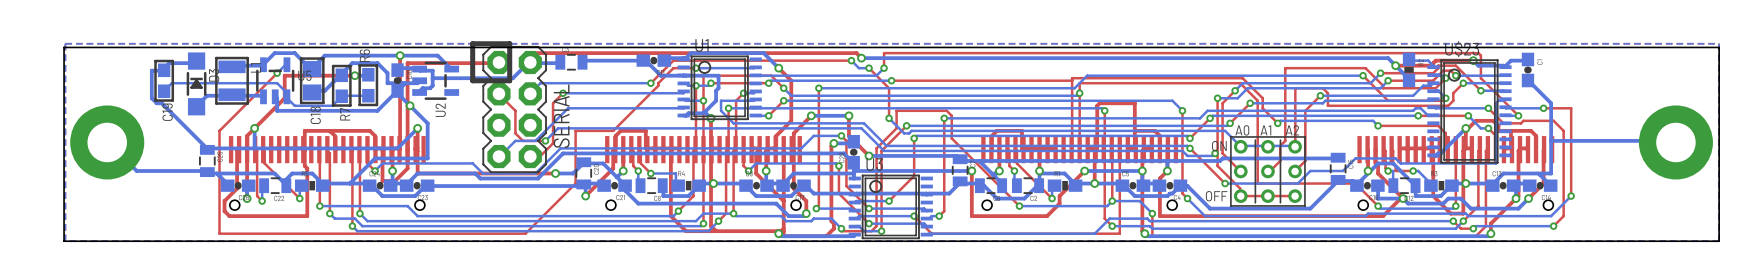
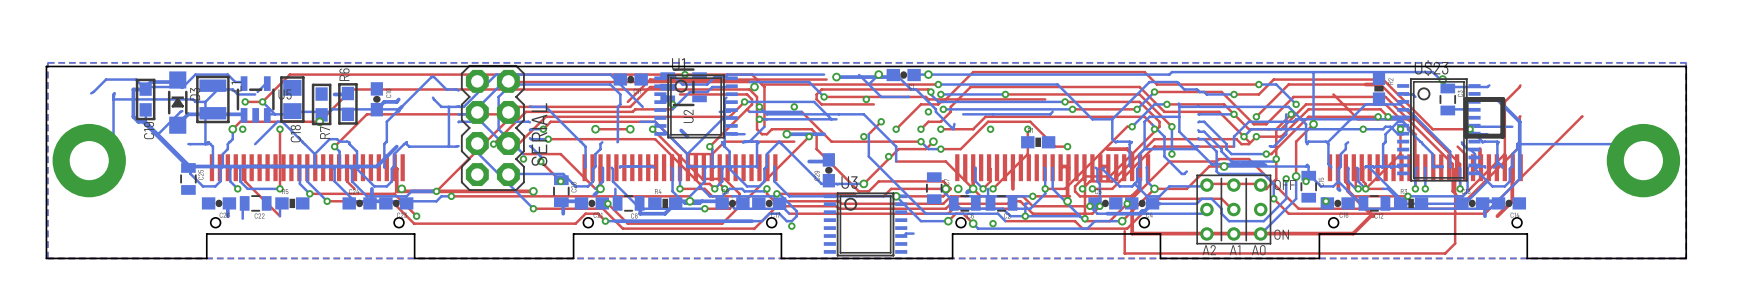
line: (509, 43) (509, 80) (472, 80) (472, 43) (509, 43) -> none
top track: (999, 53) (884, 53) (884, 68) -> (973, 72) (943, 101) (938, 104) (920, 104) (896, 129)
top track: (1172, 53) (1478, 53) (1480, 55) (1480, 78) (1518, 115) -> (1144, 72) (1157, 84) (1258, 84)
bottom track: none -> (1313, 72) (1313, 124)
top track: (400, 55) (400, 148) (391, 149) (392, 170) -> none
via: (400, 55) -> none
via: none -> (684, 74)
bottom track: none -> (824, 74) (727, 74) (726, 76) (714, 77) (707, 84) (682, 84) (675, 77) (667, 75)
bottom track: none -> (878, 74) (868, 84)
via: none -> (878, 74)
via: none -> (928, 74)
bottom track: none -> (859, 75) (881, 96) (908, 96)
bottom track: none -> (914, 75) (1432, 72) (1447, 88) (1489, 85)
top track: (861, 58) (856, 53) (530, 53) (530, 62) -> none
bottom track: (924, 58) (1388, 58) (1409, 80) -> (898, 77) (911, 89) (916, 89) (953, 129) (954, 123)
bottom track: (1409, 59) (1428, 60) (1433, 67) -> none
bottom track: (1527, 59) (1510, 60) (1505, 67) (1478, 65) (1473, 60) -> none
bottom track: (664, 60) (665, 58) (683, 59) (690, 53) (763, 53) (778, 68) -> none
bottom track: (851, 60) (858, 68) (869, 68) -> none
via: (851, 60) -> none
top track: (1473, 60) (1435, 60) (1433, 65) (1410, 65) -> (1460, 188) (1460, 164) (1380, 84)
top track: (498, 62) (407, 63) (407, 168) (395, 181) (382, 181) (383, 149) (375, 149) (374, 135) (369, 130) (331, 132) -> none
bottom track: (560, 62) (527, 63) (512, 78) (432, 78) -> none
part rotation: 0° (571, 62) -> 90° clockwise (1447, 99)
part position: (571, 62) -> (1447, 99)
bottom track: (582, 62) (583, 60) (645, 60) (660, 75) (718, 75) (716, 100) (703, 113) (688, 113) (683, 115) -> none
bottom track: none -> (503, 82) (471, 114) (458, 114)
bottom track: none -> (749, 82) (809, 82) (824, 96)
top track: none -> (749, 82) (503, 82)
bottom track: none -> (244, 83) (235, 82) (227, 74) (195, 74) (182, 87) (145, 87) (135, 79) (106, 79) (91, 93)
top track: none -> (938, 84) (761, 84)
via: none -> (938, 84)
bottom track: none -> (1258, 84) (1276, 84) (1296, 104)
via: none -> (1258, 84)
top track: none -> (1365, 84) (1288, 84) (1256, 116)
via: (1395, 65) -> none
bottom track: (232, 66) (262, 65) (274, 53) (294, 53) (312, 69) (324, 55) (437, 55) (451, 69) -> none
top track: none -> (1520, 85) (1504, 101) (1504, 154) (1462, 196) (1457, 196) (1452, 191) (1452, 164) (1385, 96) (1293, 96) (1266, 124) (1253, 124) (1221, 91) (1154, 91)
via: (695, 68) -> none
bottom track: (736, 68) (695, 68) -> (712, 87) (707, 91) (689, 91) (672, 109)
top track: (778, 68) (791, 80) (791, 120) (776, 135) (775, 149) (768, 148) (766, 150) (766, 170) -> none
top track: (869, 68) (889, 88) (889, 118) -> none
via: (869, 68) -> none
bottom track: (884, 68) (876, 75) (755, 75) -> none
via: (884, 68) -> none
bottom track: (397, 70) (397, 68) (417, 68) (420, 70) (432, 70) (432, 85) (430, 88) (422, 88) -> (458, 90) (446, 89) (434, 77) (431, 77) (401, 106)
part rotation: 0° (1527, 70) -> 90° clockwise (903, 75)
part position: (1527, 70) -> (903, 75)
top track: (277, 73) (219, 130) (219, 233) (525, 233) (575, 183) (575, 130) (613, 130) (658, 85) (658, 83) -> (334, 146) (366, 114) (506, 114) (513, 106) (630, 106) (635, 101)
via: (277, 73) -> none
bottom track: none -> (930, 91) (938, 101) (1065, 101)
top track: none -> (930, 91) (928, 89) (821, 89) (816, 94) (816, 99) (821, 104) (873, 104)
via: none -> (930, 91)
bottom track: none -> (1154, 91) (1137, 109)
via: none -> (1154, 91)
bottom track: (1380, 73) (1370, 83) (1242, 83) (1235, 90) -> none
top track: (1380, 73) (1433, 73) (1438, 65) (1455, 65) (1480, 90) -> none
via: (1380, 73) -> none
bottom track: none -> (255, 94) (237, 94) (232, 89) (218, 87) (205, 101) (205, 144) (208, 142)
top track: (354, 75) (284, 75) (284, 98) (247, 135) (247, 198) -> none
via position: (354, 75) -> (319, 121)
top track: (703, 75) (703, 223) -> none
via: none -> (940, 94)
bottom track: none -> (1005, 94) (940, 94)
top track: none -> (1005, 94) (1139, 94) (1171, 126)
via: none -> (1005, 94)
bottom track: (1235, 75) (1087, 75) (1074, 88) (818, 88) -> (1206, 94) (1196, 89) (1184, 89) (1176, 82) (1149, 82) (1112, 119) (1112, 139) (1115, 142) (1131, 142) (1129, 144) (1129, 166)
top track: none -> (1234, 94) (1258, 94) (1273, 79) (1383, 79) (1432, 129) (1470, 129)
via: none -> (1234, 94)
bottom track: (1363, 75) (1262, 75) -> none
via: (1363, 75) -> none
top track: (1455, 75) (1450, 70) (1443, 70) (1433, 80) (1388, 80) -> none
via: (1455, 75) -> none
bottom track: (1505, 75) (1455, 75) -> none
bottom track: none -> (432, 97) (441, 106) (463, 106) (496, 74) (610, 74) (642, 106)
bottom track: none -> (726, 97) (724, 99) (724, 146) (722, 142) (722, 144) (729, 151) (729, 166) (731, 167) (729, 168) (747, 186) (759, 186) (764, 181) (766, 154) (779, 141) (821, 183) (863, 183)
via: none -> (824, 96)
top track: (1445, 78) (1435, 88) (1383, 88) (1383, 85) (1365, 68) (1285, 68) (1285, 140) (1280, 145) (1280, 160) (1267, 171) -> none
via: (1445, 78) -> none
U2 position: (435, 80) -> (683, 87)
top track: (776, 80) (783, 88) -> (752, 99) (752, 104) (709, 146)
bottom track: (891, 80) (771, 80) (768, 83) -> (831, 119) (814, 101) (744, 101)
top track: (954, 80) (891, 80) -> (928, 99) (925, 96) (824, 96)
bottom track: (1388, 80) (1380, 88) (1317, 88) -> (1327, 142) (1308, 141) (1307, 144) (1306, 124) (1288, 106)
via: (1388, 80) -> none
line: none -> (1502, 99) (1502, 136) (1466, 136) (1466, 99) (1502, 99)
bottom track: (214, 83) (171, 83) (164, 91) -> (195, 101) (193, 99) (113, 99) (114, 93) (113, 94) (113, 136) (89, 160)
bottom track: (224, 83) (277, 83) (284, 90) (284, 95) (294, 105) (332, 105) (342, 95) (368, 95) -> none
top track: none -> (245, 101) (262, 101) (289, 74) (752, 74) (764, 87) (764, 126)
via: none -> (245, 101)
bottom track: none -> (262, 101) (275, 114)
via: none -> (262, 101)
bottom track: (650, 83) (540, 83) (530, 93) -> none
via: (650, 83) -> none
bottom track: (711, 83) (708, 85) (688, 85) (683, 83) -> none
via: (711, 83) -> none
top track: (768, 83) (711, 83) -> (744, 101) (729, 116) (545, 116) (518, 144) (503, 144)
top track: (1092, 83) (1079, 83) (1079, 149) -> none
via: none -> (1065, 101)
top track: (1167, 83) (1240, 83) (1257, 100) (1257, 183) (1355, 183) (1378, 206) -> (1139, 101) (1159, 121) (1159, 126) (1109, 176) (1084, 176) (1075, 186) (1075, 191) (1080, 196) (1134, 196) (1169, 161) (1248, 159) (1298, 208) (1457, 208) (1519, 146) (1520, 116)
top track: (1463, 83) (1453, 93) (1453, 100) (1448, 105) (1327, 105) (1327, 93) (1322, 88) (1295, 88) (1295, 146) -> none
via: (1463, 83) -> none
bottom track: (1505, 83) (1463, 83) -> none
bottom track: (403, 84) (387, 83) (387, 73) (377, 63) (352, 63) (324, 90) (312, 90) (312, 92) -> none
top track: (695, 85) (693, 196) (678, 211) -> none
bottom track: none -> (1166, 104) (1154, 104) (1132, 126)
via: none -> (1166, 104)
via: none -> (1296, 104)
bottom track: (1423, 85) (1413, 95) (1320, 95) -> (1393, 104) (1365, 104) (1327, 142)
bottom track: none -> (529, 106) (545, 106) (585, 146) (585, 167)
bottom track: none -> (448, 106) (448, 146)
top track: (818, 88) (818, 206) (816, 208) -> none
bottom track: (1247, 88) (1237, 98) (1217, 98) -> (1219, 106) (1198, 106) (1196, 106) (1179, 106) (1178, 103) (1179, 131) (1194, 146) (1198, 146)
top track: none -> (672, 109) (635, 109) (632, 111) (525, 111) (493, 144)
top track: none -> (747, 109) (749, 111)
via: none -> (943, 109)
bottom track: none -> (1072, 109) (943, 109)
via: none -> (1072, 109)
top track: none -> (1137, 109) (1072, 109)
via: none -> (1137, 109)
top track: (1235, 90) (1222, 103) (1222, 153) (1240, 171) -> none
via: (1235, 90) -> none
via: (1480, 90) -> none
bottom track: (683, 91) (683, 93) (563, 93) -> none
bottom track: none -> (145, 111) (145, 121) (190, 166) (190, 173) (202, 186) (215, 186) (220, 181) (222, 154) (232, 139) (232, 129)
bottom track: none -> (182, 111) (158, 134)
top track: (498, 93) (515, 110) (515, 133) (522, 140) (545, 140) -> none
top track: (563, 93) (553, 103) (553, 143) (540, 155) (532, 155) -> none
via: (563, 93) -> none
top track: (743, 93) (736, 100) (733, 213) -> none
via: (743, 93) -> none
bottom track: none -> (801, 111) (749, 111)
top track: none -> (801, 111) (831, 141) (920, 141)
via: none -> (928, 111)
via: (1079, 93) -> none
bottom track: (989, 95) (889, 95) -> (896, 161) (896, 146) (863, 114)
bottom track: none -> (1234, 114) (1198, 114)
via: none -> (1234, 114)
bottom track: none -> (1286, 114) (1286, 134) (1273, 146) (1269, 146)
bottom track: (275, 96) (277, 98) (277, 110) (377, 110) (397, 91) (427, 123) (427, 158) (374, 158) (349, 183) -> none
bottom track: none -> (267, 115) (297, 114) (299, 111) (329, 111) (332, 109) (399, 109) (386, 121) (384, 167)
top track: none -> (1582, 116) (1484, 213) (1288, 213) (1273, 198)
bottom track: none -> (724, 116) (687, 154)
bottom track: none -> (1179, 116) (1149, 116) (1144, 121) (1144, 149) (1139, 154) (1137, 181) (1132, 186) (1119, 186) (1102, 168) (1104, 167)
top track: (1217, 98) (1217, 165) (1240, 188) (1240, 196) (1267, 196) -> none
via: (1217, 98) -> none
via: none -> (1256, 116)
top track: none -> (1378, 116) (1308, 116) (1271, 154) (1266, 154)
via: none -> (1378, 116)
bottom track: none -> (1388, 116) (1415, 116) (1450, 151) (1451, 167)
top track: none -> (1388, 116) (1380, 109) (1308, 109) (1281, 136) (1256, 136) (1248, 144) (1241, 144) (1236, 139) (1154, 139) (1112, 181) (1089, 181) (1082, 188)
via: none -> (1388, 116)
via: (1445, 98) -> none
bottom track: (683, 99) (703, 100) -> none
bottom track: (755, 99) (721, 100) (721, 110) (733, 123) (768, 123) -> (764, 126) (749, 141) (742, 142) (744, 141)
bottom track: (1505, 99) (1495, 103) (1495, 163) (1400, 163) (1395, 158) (1355, 158) (1342, 170) (1310, 170) (1297, 183) (1225, 183) -> none
via: (703, 100) -> none
top track: (783, 100) (768, 115) -> none
bottom track: (1119, 100) (861, 100) -> (1092, 119) (1057, 84) (938, 84)
bottom track: (1139, 100) (1172, 100) (1182, 110) -> none
bottom track: none -> (458, 122) (481, 121) (503, 144)
bottom track: none -> (506, 121) (529, 122)
top track: none -> (506, 121) (436, 191)
bottom track: none -> (640, 121) (655, 121) (687, 154)
top track: none -> (881, 121) (868, 134)
via: none -> (881, 121)
bottom track: none -> (1198, 122) (1204, 121) (1226, 144) (1226, 149) (1231, 154) (1266, 154)
top track: (1250, 103) (1230, 123) -> none
via: (1250, 103) -> none
bottom track: (1277, 103) (1250, 103) -> (1248, 121) (1234, 136) (1234, 146)
via: (410, 105) -> none
top track: none -> (1152, 124) (1144, 116) (985, 116) (973, 129) (940, 129)
top track: none -> (1313, 124) (1296, 141) (1296, 176)
via: none -> (1313, 124)
bottom track: (683, 107) (568, 108) (535, 140) (515, 140) (498, 156) -> none
bottom track: (1433, 107) (1488, 108) -> none
bottom track: (728, 108) (1102, 108) (1104, 110) -> none
top track: (728, 108) (726, 213) (718, 221) -> none
via: (728, 108) -> none
top track: none -> (1132, 126) (1127, 126) (1065, 188) (1045, 188)
via: none -> (1132, 126)
bottom track: none -> (1171, 126) (1171, 154)
via: none -> (1171, 126)
top track: (1262, 108) (1262, 98) (1242, 78) (1072, 78) (1071, 149) -> (1234, 126) (1219, 111) (1164, 111) (1139, 87) (970, 87) (950, 106) (950, 111) (940, 121) (928, 121) (920, 129)
top track: (1488, 108) (1503, 123) (1521, 123) (1523, 120) (1553, 120) (1563, 130) (1563, 216) (1553, 226) -> none
via: (1488, 108) -> none
top track: (1543, 108) (1571, 108) (1571, 196) -> none
via: (1543, 108) -> none
top track: none -> (232, 129) (240, 121) (319, 121) (352, 89) (749, 89) (757, 96) (757, 129) (761, 134) (766, 134) (771, 129) (811, 129) (816, 134) (816, 149) (858, 191) (868, 191) (878, 181) (943, 181) (950, 188) (943, 196) (896, 196)
via: none -> (242, 129)
top track: none -> (279, 129) (279, 188)
via: none -> (279, 129)
bottom track: none -> (543, 129) (529, 130)
top track: none -> (543, 129) (550, 121) (655, 121) (687, 154) (712, 154) (724, 141) (794, 141)
via: none -> (543, 129)
via: none -> (595, 129)
top track: none -> (630, 129) (595, 129)
via: none -> (630, 129)
top track: none -> (652, 129) (702, 178) (724, 178) (739, 193) (739, 198) (729, 208) (704, 208)
via: none -> (652, 129)
via: none -> (896, 129)
via: none -> (920, 129)
via: none -> (940, 129)
via: none -> (990, 129)
top track: none -> (1027, 129) (1027, 154) (993, 188)
via: none -> (1027, 129)
top track: (1104, 110) (1104, 218) (1112, 226) -> none
via: (1104, 110) -> none
top track: (1182, 110) (1182, 193) (1187, 198) -> none
bottom track: (1280, 110) (1207, 110) (1200, 118) (944, 118) -> (1251, 129) (1243, 136)
via: none -> (1363, 129)
top track: none -> (1400, 129) (1400, 154) (1365, 188)
via: none -> (1400, 129)
bottom track: none -> (1470, 129) (1482, 142) (1498, 142) (1497, 164) (1493, 167)
via: none -> (1470, 129)
bottom track: none -> (1198, 130) (1204, 131) (1231, 161) (1273, 161) (1276, 159)
via: (768, 115) -> none
top track: (811, 115) (793, 133) (793, 148) (791, 149) -> none
top track: (848, 115) (848, 135) (869, 155) -> none
via: (848, 115) -> none
bottom track: none -> (868, 134) (868, 156) (925, 213) (998, 213) (1005, 221)
bottom track: (1418, 115) (1212, 115) (1210, 118) -> none
via: (1418, 115) -> none
bottom track: (1468, 115) (1480, 128) (1488, 128) -> none
top track: (1468, 115) (1418, 115) -> none
via: (1468, 115) -> none
via: (1518, 115) -> none
top track: (711, 118) (711, 226) (716, 231) (778, 231) (778, 233) (783, 228) (783, 149) -> none
via: (711, 118) -> none
top track: none -> (809, 136) (722, 223) (627, 223) (607, 203)
bottom track: (889, 118) (904, 133) (909, 133) (911, 130) (954, 130) -> (920, 141) (928, 149)
top track: (944, 118) (944, 211) (939, 216) -> none
via: (944, 118) -> none
top track: (1210, 118) (1190, 138) -> none
via: (1210, 118) -> none
via: none -> (1243, 136)
via: none -> (1256, 136)
bottom track: none -> (529, 138) (548, 139)
bottom track: none -> (1198, 138) (1204, 139) (1216, 151) (1216, 171) (1219, 173) (1263, 173) (1273, 183) (1273, 198)
top track: none -> (548, 139) (655, 139) (699, 183) (709, 183) (714, 188)
via: none -> (548, 139)
bottom track: none -> (208, 142) (207, 144) (188, 144)
bottom track: none -> (208, 142) (212, 146) (213, 167)
bottom track: none -> (602, 142) (600, 149) (595, 154) (593, 181) (588, 186) (575, 186) (563, 173) (511, 173)
bottom track: none -> (617, 142) (617, 106) (620, 104) (620, 94) (610, 84) (511, 84) (498, 96) (498, 129) (523, 154)
bottom track: (781, 123) (864, 123) (886, 145) (1187, 145) (1190, 148) -> (757, 141) (758, 142) (757, 144) (757, 167)
via: none -> (920, 141)
top track: none -> (933, 141) (925, 149) (898, 149) (863, 183)
via: none -> (933, 141)
bottom track: (1230, 123) (1227, 125) (906, 125) -> none
via: (1230, 123) -> none
bottom track: (1277, 123) (1280, 120) (1373, 120) (1378, 125) -> none
via: (1277, 123) -> none
bottom track: none -> (1327, 142) (1328, 164) (1331, 167)
bottom track: none -> (1348, 142) (1345, 144) (1345, 149) (1340, 154) (1338, 181)
bottom track: none -> (1461, 142) (1475, 154) (1475, 166) (1476, 167)
bottom track: none -> (255, 144) (277, 121) (282, 121) (314, 154)
via: none -> (493, 144)
top track: (906, 125) (881, 150) (881, 231) -> none
via: (906, 125) -> none
top track: (1378, 125) (1438, 125) (1445, 133) -> (1166, 104) (1224, 104) (1248, 129) (1281, 129) (1306, 104) (1385, 104) (1415, 134) (1415, 151)
via: (1378, 125) -> none
bottom track: none -> (458, 146) (409, 146) (406, 142) (394, 154) (391, 181) (386, 186) (374, 186) (357, 168) (358, 167) (357, 166) (357, 151) (349, 142) (329, 139) (314, 154)
bottom track: none -> (529, 146) (540, 156) (540, 161)
bottom track: (254, 128) (254, 148) -> none
via position: (254, 128) -> (232, 129)
bottom track: none -> (334, 146) (339, 151) (339, 166) (341, 167)
via: none -> (334, 146)
top track: (417, 128) (417, 148) (415, 149) -> none
via: (417, 128) -> none
bottom track: none -> (471, 146) (533, 208)
bottom track: none -> (709, 146) (712, 149) (712, 166) (714, 167)
via: none -> (709, 146)
top track: none -> (1067, 146) (1055, 146) (1030, 121) (988, 121) (960, 149) (940, 149)
via: none -> (1067, 146)
top track: none -> (1234, 146) (1154, 146) (1112, 188) (1092, 188)
bottom track: (1465, 128) (1440, 153) (1433, 155) -> none
top track: (1465, 128) (1465, 148) (1463, 150) (1463, 213) (1450, 213) (1433, 196) (1433, 150) (1430, 148) (1399, 149) -> none
via: (1465, 128) -> none
via: (1488, 128) -> none
via: none -> (940, 149)
bottom track: (1172, 130) (966, 130) -> none
top track: (1465, 130) (1475, 120) (1493, 120) (1498, 125) (1498, 130) (1531, 130) (1536, 135) (1536, 149) -> none
bottom track: none -> (314, 154) (314, 166) (317, 166)
top track: none -> (523, 154) (560, 154) (595, 188)
bottom track: none -> (687, 154) (687, 166) (689, 166)
bottom track: (841, 135) (813, 135) (801, 148) (781, 148) -> none
top track: (841, 135) (846, 140) (846, 186) (869, 208) -> none
via position: (841, 135) -> (809, 136)
via: none -> (1171, 154)
via: none -> (1266, 154)
top track: (914, 138) (914, 176) (889, 201) -> none
bottom track: (1190, 138) (1187, 135) (916, 135) (914, 138) -> none
via: (1190, 138) -> none
bottom track: (545, 140) (558, 128) (861, 128) (884, 150) (1182, 150) (1187, 155) (1210, 155) -> (1152, 124) (1164, 136) (1164, 156) (1181, 173)
via: none -> (1276, 159)
bottom track: (1673, 140) (1551, 140) -> (1641, 159) (1626, 144) (1519, 144) (1519, 142) (1517, 149) (1512, 154) (1509, 181) (1504, 186) (1492, 186) (1475, 168) (1476, 167)
bottom track: (107, 142) (136, 170) (206, 170) (209, 173) (217, 173) (227, 185) -> none
top track: none -> (540, 161) (560, 181)
via: none -> (540, 161)
top track: (833, 143) (831, 145) (831, 221) (833, 223) (833, 228) (826, 236) (783, 236) (782, 229) -> none
via: (833, 143) -> none
top track: none -> (896, 161) (945, 161) (980, 196) (1022, 196) (1032, 206) (1089, 206)
bottom track: none -> (1497, 161) (1502, 167)
bottom track: (643, 148) (560, 148) (535, 173) (482, 173) (472, 163) (382, 163) (374, 170) -> (620, 166) (620, 167)
bottom track: (713, 148) (675, 148) -> (654, 167) (652, 166)
bottom track: none -> (774, 166) (774, 181) (789, 196) (896, 196) (920, 221) (948, 221)
bottom track: none -> (1147, 166) (1147, 181) (1154, 188)
top track: (1190, 148) (1225, 183) -> none
via: (1190, 148) -> none
bottom track: none -> (1224, 166) (1306, 166) (1307, 164) (1308, 173) (1320, 186) (1333, 186) (1338, 181)
top track: none -> (1224, 166) (1209, 166) (1186, 188) (1154, 188) (1122, 221)
via: none -> (1224, 166)
bottom track: none -> (1368, 166) (1405, 203) (1465, 203) (1487, 181)
bottom track: none -> (1383, 166) (1399, 167)
bottom track: none -> (1383, 166) (1383, 144) (1385, 141) (1385, 134) (1398, 121) (1402, 121) (1432, 154) (1432, 166) (1442, 167)
bottom track: none -> (1383, 166) (1365, 167)
bottom track: none -> (230, 167) (230, 181) (237, 188)
top track: (255, 149) (257, 150) (257, 196) (262, 201) -> none
bottom track: none -> (238, 167) (240, 181) (247, 188) (279, 188)
bottom track: none -> (298, 167) (299, 183) (309, 193)
top track: (319, 149) (319, 206) -> none
bottom track: none -> (307, 167) (307, 181) (327, 201)
top track: (327, 149) (329, 153) (329, 213) -> none
top track: (343, 149) (335, 149) (334, 135) (329, 130) (304, 130) (303, 149) (304, 165) (307, 168) (307, 216) (229, 216) (224, 211) (224, 201) (237, 188) (237, 150) (239, 149) -> none
top track: (351, 149) (352, 226) -> none
bottom track: none -> (332, 167) (334, 181) (354, 201) (371, 201)
top track: (359, 149) (359, 213) -> none
bottom track: none -> (350, 167) (352, 168) (352, 181) (366, 196) (406, 196) (411, 191)
bottom track: none -> (602, 167) (602, 181) (595, 188)
top track: (631, 149) (633, 150) (633, 165) (638, 170) -> none
bottom track: none -> (611, 167) (612, 181) (640, 208) (704, 208)
top track: (639, 149) (640, 163) (650, 173) -> none
bottom track: none -> (671, 167) (672, 191) (684, 203) (699, 203) (702, 201)
bottom track: none -> (679, 167) (679, 188)
bottom track: none -> (705, 167) (704, 181) (689, 196)
bottom track: none -> (722, 167) (722, 181) (714, 188)
top track: (751, 149) (759, 149) (756, 153) (756, 173) (783, 201) -> none
top track: (791, 149) (793, 150) (793, 188) (806, 201) (806, 213) -> none
bottom track: none -> (975, 167) (975, 181) (983, 188)
top track: (1007, 149) (1009, 150) (1009, 165) (1014, 170) -> none
top track: (1055, 149) (1023, 149) (1021, 130) (996, 130) (991, 135) (991, 149) -> none
bottom track: none -> (1044, 167) (1045, 193) (1030, 208) (1017, 208)
bottom track: none -> (1052, 167) (1052, 188) (1084, 221)
top track: (1119, 149) (1119, 233) (931, 233) (914, 216) -> none
bottom track: none -> (1095, 167) (1097, 168) (1097, 181) (1099, 183) (1099, 206)
top track: (1135, 149) (1134, 103) (1099, 103) (1097, 105) (1095, 149) -> none
top track: (1151, 149) (1144, 148) (1142, 150) (1142, 231) (1144, 233) -> none
bottom track: none -> (1348, 167) (1348, 181) (1355, 188)
bottom track: none -> (1356, 167) (1358, 181) (1365, 188)
bottom track: none -> (1416, 167) (1415, 188)
bottom track: none -> (1425, 167) (1425, 188)
top track: (1455, 149) (1455, 206) -> none
top track: (1479, 149) (1478, 206) (1463, 221) -> none
bottom track: none -> (1459, 167) (1460, 188)
bottom track: none -> (1468, 167) (1467, 191) (1462, 196) (1407, 196)
bottom track: none -> (1485, 167) (1476, 167)
top track: (1528, 149) (1521, 148) (1518, 150) (1518, 196) (1490, 223) (1490, 233) -> none
via: (1215, 153) -> none
bottom track: (869, 155) (956, 155) (961, 160) (979, 160) (1002, 185) -> none
via position: (869, 155) -> (863, 183)
bottom track: (1338, 157) (1222, 158) (1220, 160) (980, 162) -> none
bottom track: none -> (1296, 176) (1296, 198) (1260, 233)
via: none -> (1296, 176)
via: none -> (1286, 178)
bottom track: (1551, 160) (1551, 173) (1539, 174) -> (1519, 178) (1489, 208) (1365, 208) (1338, 181)
via: none -> (560, 181)
top track: (1016, 163) (1052, 198) -> (990, 181) (983, 188)
via: none -> (1306, 181)
bottom track: (838, 165) (836, 163) (756, 163) (748, 170) -> none
top track: (838, 165) (838, 193) (869, 223) -> none
via: (838, 165) -> none
bottom track: none -> (1134, 183) (1147, 196) (1159, 196) (1169, 186) (1206, 185)
top track: none -> (1260, 185) (1206, 185)
bottom track: none -> (699, 186) (709, 196) (722, 196) (729, 188) (742, 188) (744, 191) (764, 191) (766, 188)
via: none -> (237, 188)
via: none -> (279, 188)
via: (374, 170) -> none
via: (392, 170) -> none
via: none -> (401, 188)
via: (638, 170) -> none
top track: none -> (679, 188) (704, 188) (712, 196) (732, 196)
via: none -> (679, 188)
via: none -> (714, 188)
bottom track: (766, 170) (767, 185) (768, 183) (781, 183) (783, 185) (793, 173) (853, 173) -> none
via: (766, 170) -> none
top track: none -> (766, 188) (766, 193) (774, 201) (943, 203) (950, 196) (965, 196)
via: none -> (766, 188)
bottom track: none -> (940, 188) (960, 208) (1002, 208) (1010, 216) (1080, 216)
top track: none -> (940, 188) (891, 188) (883, 196) (856, 196) (853, 193) (776, 193)
bottom track: (971, 170) (853, 170) -> none
via: none -> (958, 188)
via: none -> (983, 188)
via: (1014, 170) -> none
via: none -> (993, 188)
bottom track: (1039, 170) (1039, 185) (1024, 198) (996, 198) (979, 183) (961, 183) (960, 181) (949, 193) (813, 193) (804, 185) (791, 196) (756, 196) (743, 183) -> (789, 213) (784, 208) (734, 208) (727, 201) (719, 201)
via: (1039, 170) -> none
via: none -> (1045, 188)
bottom track: (1084, 170) (1142, 170) (1143, 185) (1144, 183) (1157, 183) (1159, 185) -> none
top track: (1084, 170) (1059, 196) (1059, 203) (1047, 216) (971, 216) (971, 170) -> none
via: (1084, 170) -> none
via: none -> (1082, 188)
via: none -> (1092, 188)
via: (1142, 170) -> none
via position: (1167, 170) -> (1154, 188)
via: (1368, 170) -> none
bottom track: (1388, 170) (1393, 170) (1393, 185) -> none
via: none -> (1365, 188)
via: (1413, 170) -> none
via: none -> (1415, 188)
via: none -> (1425, 188)
via: none -> (1460, 188)
part: (1267, 171) -> none
bottom track: (432, 173) (417, 173) (406, 185) (405, 183) -> (451, 196) (441, 196) (436, 201) (384, 201)
bottom track: (457, 173) (475, 173) (480, 178) (537, 178) (563, 153) (843, 153) (853, 162) (854, 178) -> none
via: none -> (436, 191)
bottom track: (555, 173) (573, 173) (583, 162) (603, 163) (625, 186) (625, 191) (638, 203) -> (605, 221) (615, 221)
bottom track: (650, 173) (675, 173) (675, 183) (678, 185) -> none
via: (650, 173) -> none
bottom track: (1039, 173) (1064, 173) (1075, 185) (1077, 183) (1122, 183) (1134, 196) -> (1089, 206) (1097, 213) (1107, 213)
bottom track: (218, 174) (274, 173) (286, 185) (284, 181) (292, 173) (312, 173) (322, 185) (324, 183) (367, 183) (382, 196) (415, 196) (427, 185) (583, 186) (583, 184) -> none
top track: none -> (309, 193) (394, 193) (416, 216)
via: none -> (309, 193)
via: none -> (776, 193)
via: none -> (451, 196)
top track: none -> (689, 196) (451, 196)
via: none -> (896, 196)
bottom track: none -> (1032, 196) (965, 196)
via: none -> (1032, 196)
top track: none -> (1070, 196) (1032, 196)
top track: none -> (1407, 196) (1353, 196)
via: none -> (1407, 196)
via: none -> (1273, 198)
bottom track: (1353, 181) (1338, 179) (1310, 208) (1210, 208) (1187, 186) -> (1286, 178) (1286, 198) (1263, 221) (1229, 221) (1221, 213) (1221, 208) (1211, 198) (1201, 198) (1196, 203) (1159, 203)
top track: none -> (327, 201) (391, 201) (414, 223) (575, 223) (585, 213) (598, 213) (605, 221)
via: none -> (327, 201)
via: (1225, 183) -> none
bottom track: (1355, 183) (1356, 185) (1378, 163) (1393, 163) (1415, 185) (1415, 196) (1440, 196) (1453, 183) (1490, 183) (1492, 185) (1503, 173) (1538, 173) (1550, 185) -> none
via: none -> (1325, 201)
via: (1465, 183) -> none
part position: (1065, 185) -> (1038, 142)
bottom track: (1377, 185) (1378, 198) (1403, 198) (1408, 203) (1443, 203) (1448, 198) (1460, 198) (1470, 208) (1518, 208) (1528, 198) -> none
via: none -> (607, 203)
top track: none -> (1127, 203) (1109, 221) (1084, 221)
via: none -> (1127, 203)
via: none -> (1089, 206)
top track: none -> (1099, 206) (1092, 213) (1032, 213) (1020, 201) (1010, 201) (1007, 203) (950, 203) (945, 208) (839, 208) (836, 206) (776, 206) (754, 228) (622, 228) (602, 208) (533, 208)
via: none -> (1099, 206)
via: none -> (533, 208)
via: none -> (704, 208)
top track: none -> (1017, 208) (953, 208) (948, 213) (789, 213)
bottom track: none -> (1206, 209) (1204, 213) (1139, 213)
top track: none -> (1233, 209) (1221, 198) (1157, 198) (1127, 228) (1082, 228) (1075, 221) (1005, 221)
part: none -> (1233, 209)
top track: (585, 196) (613, 168) (615, 135) (620, 130) (645, 130) (647, 149) (671, 149) (670, 216) (685, 231) (714, 229) -> none
via: (585, 196) -> none
top track: (1295, 196) (1267, 196) -> none
bottom track: (1571, 196) (1551, 216) (1468, 216) (1465, 213) (1368, 213) (1365, 216) (1205, 216) (1187, 198) -> none
via: (1571, 196) -> none
via: (247, 198) -> none
via: (299, 198) -> none
via: none -> (416, 216)
via: (1187, 198) -> none
via: (1403, 198) -> none
via: (1516, 198) -> none
via: (1528, 198) -> none
via: (262, 201) -> none
bottom track: (889, 201) (854, 202) -> none
via: (889, 201) -> none
via: none -> (605, 221)
bottom track: (776, 203) (788, 216) (803, 216) (806, 213) -> (752, 221) (761, 221) (769, 213) (779, 213) (786, 221) (791, 221) (796, 216) (796, 211) (779, 193) (774, 196) (732, 196)
top track: none -> (948, 221) (955, 213) (963, 213) (973, 223)
via: none -> (948, 221)
bottom track: none -> (1122, 221) (1094, 221) (1087, 228) (978, 228) (973, 223)
via: none -> (1122, 221)
bottom track: (319, 206) (407, 206) (417, 216) (673, 216) (678, 211) -> none
via: (319, 206) -> none
via: none -> (973, 223)
bottom track: (1019, 206) (1107, 206) (1112, 201) (1139, 201) (1152, 213) -> none
top track: (1019, 206) (951, 138) (951, 115) (946, 110) (896, 110) (896, 128) (876, 148) (876, 226) (871, 231) (841, 231) (841, 228) -> none
via: (1378, 206) -> none
bottom track: (1455, 206) (1453, 208) (1380, 208) (1378, 206) -> none
via: (1455, 206) -> none
bottom track: (816, 208) (851, 208) (854, 210) -> none
bottom track: (869, 208) (924, 208) (926, 210) -> none
via: (869, 208) -> none
via: (678, 211) -> none
bottom track: (329, 213) (334, 218) (354, 218) (362, 226) (701, 226) (703, 223) -> none
via: (329, 213) -> none
bottom track: (359, 213) (367, 221) (695, 221) (703, 213) (733, 213) (736, 216) (781, 216) (786, 221) (831, 218) (841, 228) -> none
via: (359, 213) -> none
via: (733, 213) -> none
via: (806, 213) -> none
via: (1152, 213) -> none
bottom track: (914, 216) (858, 216) (854, 218) -> none
via: (914, 216) -> none
via: (939, 216) -> none
bottom track: (718, 221) (708, 231) (357, 231) (352, 226) -> none
via: (718, 221) -> none
bottom track: (1453, 221) (1149, 221) (1147, 218) (1109, 218) (1094, 233) (926, 234) -> none
top track: (1453, 221) (1460, 228) (1473, 228) -> none
via: (1453, 221) -> none
bottom track: (1463, 221) (1455, 228) (1152, 228) (1149, 226) (1112, 226) -> none
via: (1463, 221) -> none
via: (703, 223) -> none
bottom track: (869, 223) (924, 223) (926, 226) -> none
via: (869, 223) -> none
via: (352, 226) -> none
bottom track: (854, 226) (858, 226) (864, 231) (881, 231) -> none
via: (1112, 226) -> none
bottom track: (1553, 226) (1475, 226) (1473, 228) -> none
via: (1553, 226) -> none
via: (841, 228) -> none
via: (1473, 228) -> none
via: (881, 231) -> none
bottom track: (778, 233) (781, 236) (853, 236) (854, 234) -> none
via: (778, 233) -> none
via: (1144, 233) -> none
bottom track: (1490, 233) (1488, 236) (1147, 236) (1144, 233) -> none
via: (1490, 233) -> none
board edge: (435, 241) (225, 241) -> (414, 258) (414, 233) (206, 233) (206, 258)
board edge: (805, 241) (596, 241) -> (781, 258) (781, 233) (573, 233) (573, 258)
board edge: (1188, 241) (978, 241) -> (1160, 258) (1160, 233) (952, 233) (952, 258)
board edge: (1558, 241) (1348, 241) -> (1527, 258) (1527, 233) (1319, 233) (1319, 258)

